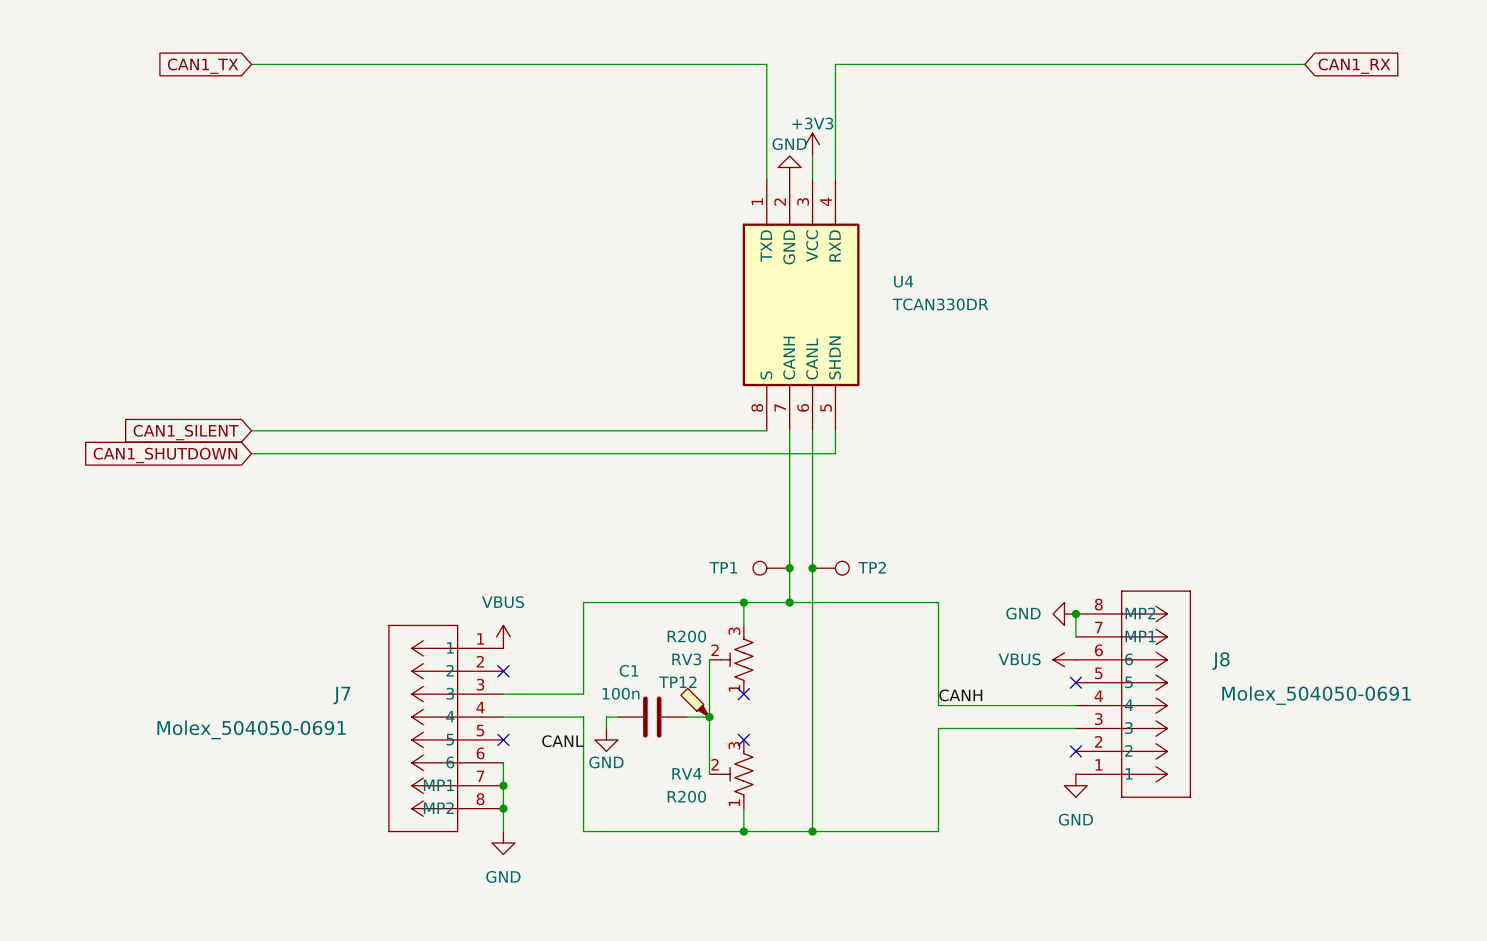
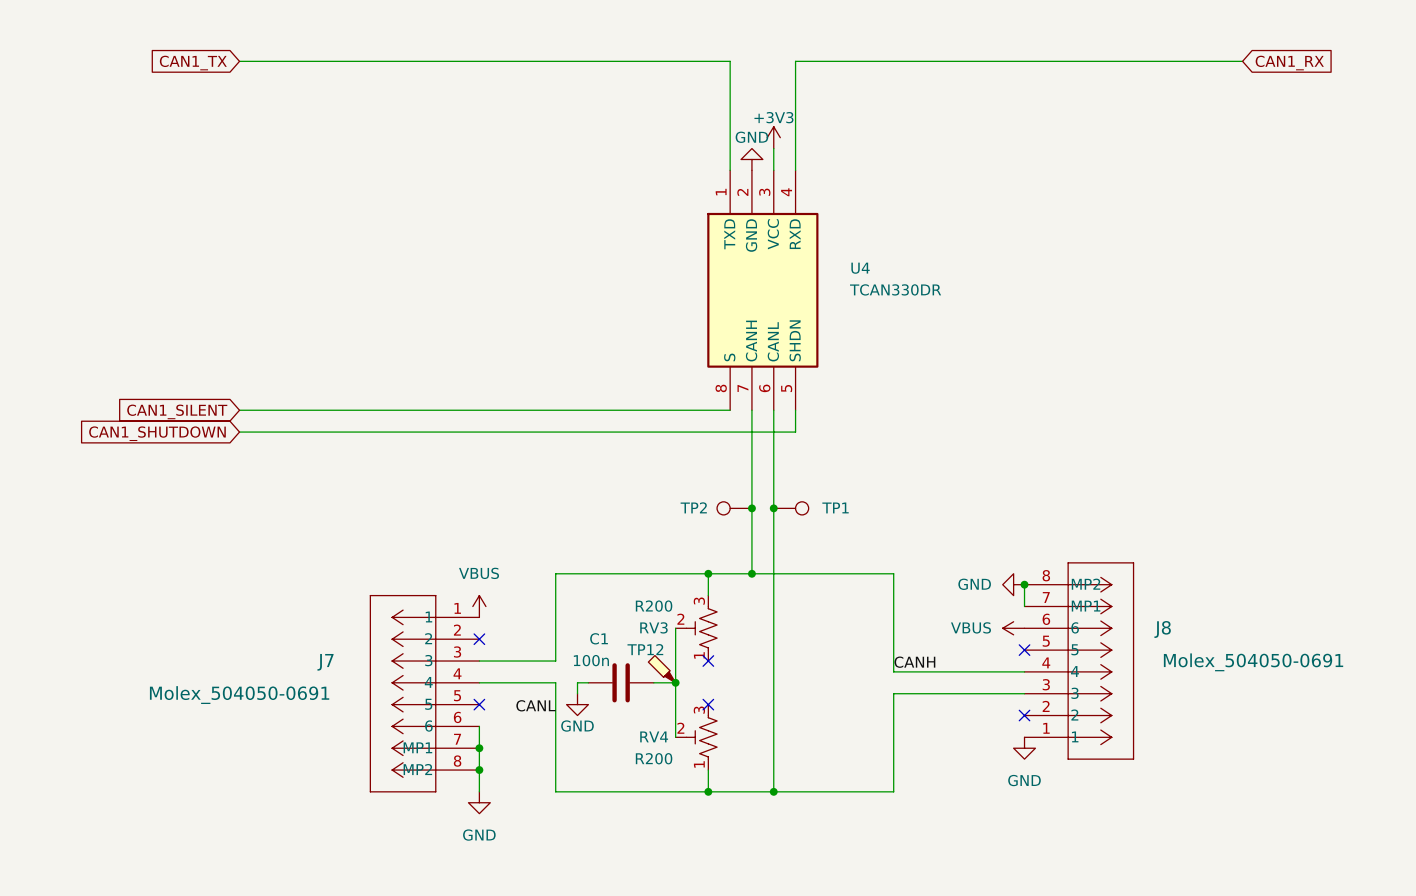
junction: none -> (751, 508)
junction: none -> (773, 508)
TP1 rotation: 0° (759, 568) -> 180° (802, 508)
TP1 position: (771, 568) -> (791, 508)
junction: (789, 568) -> none
junction: (812, 568) -> none
TP2 position: (830, 568) -> (734, 508)
TP2 rotation: 0° (842, 568) -> 180° (723, 508)

